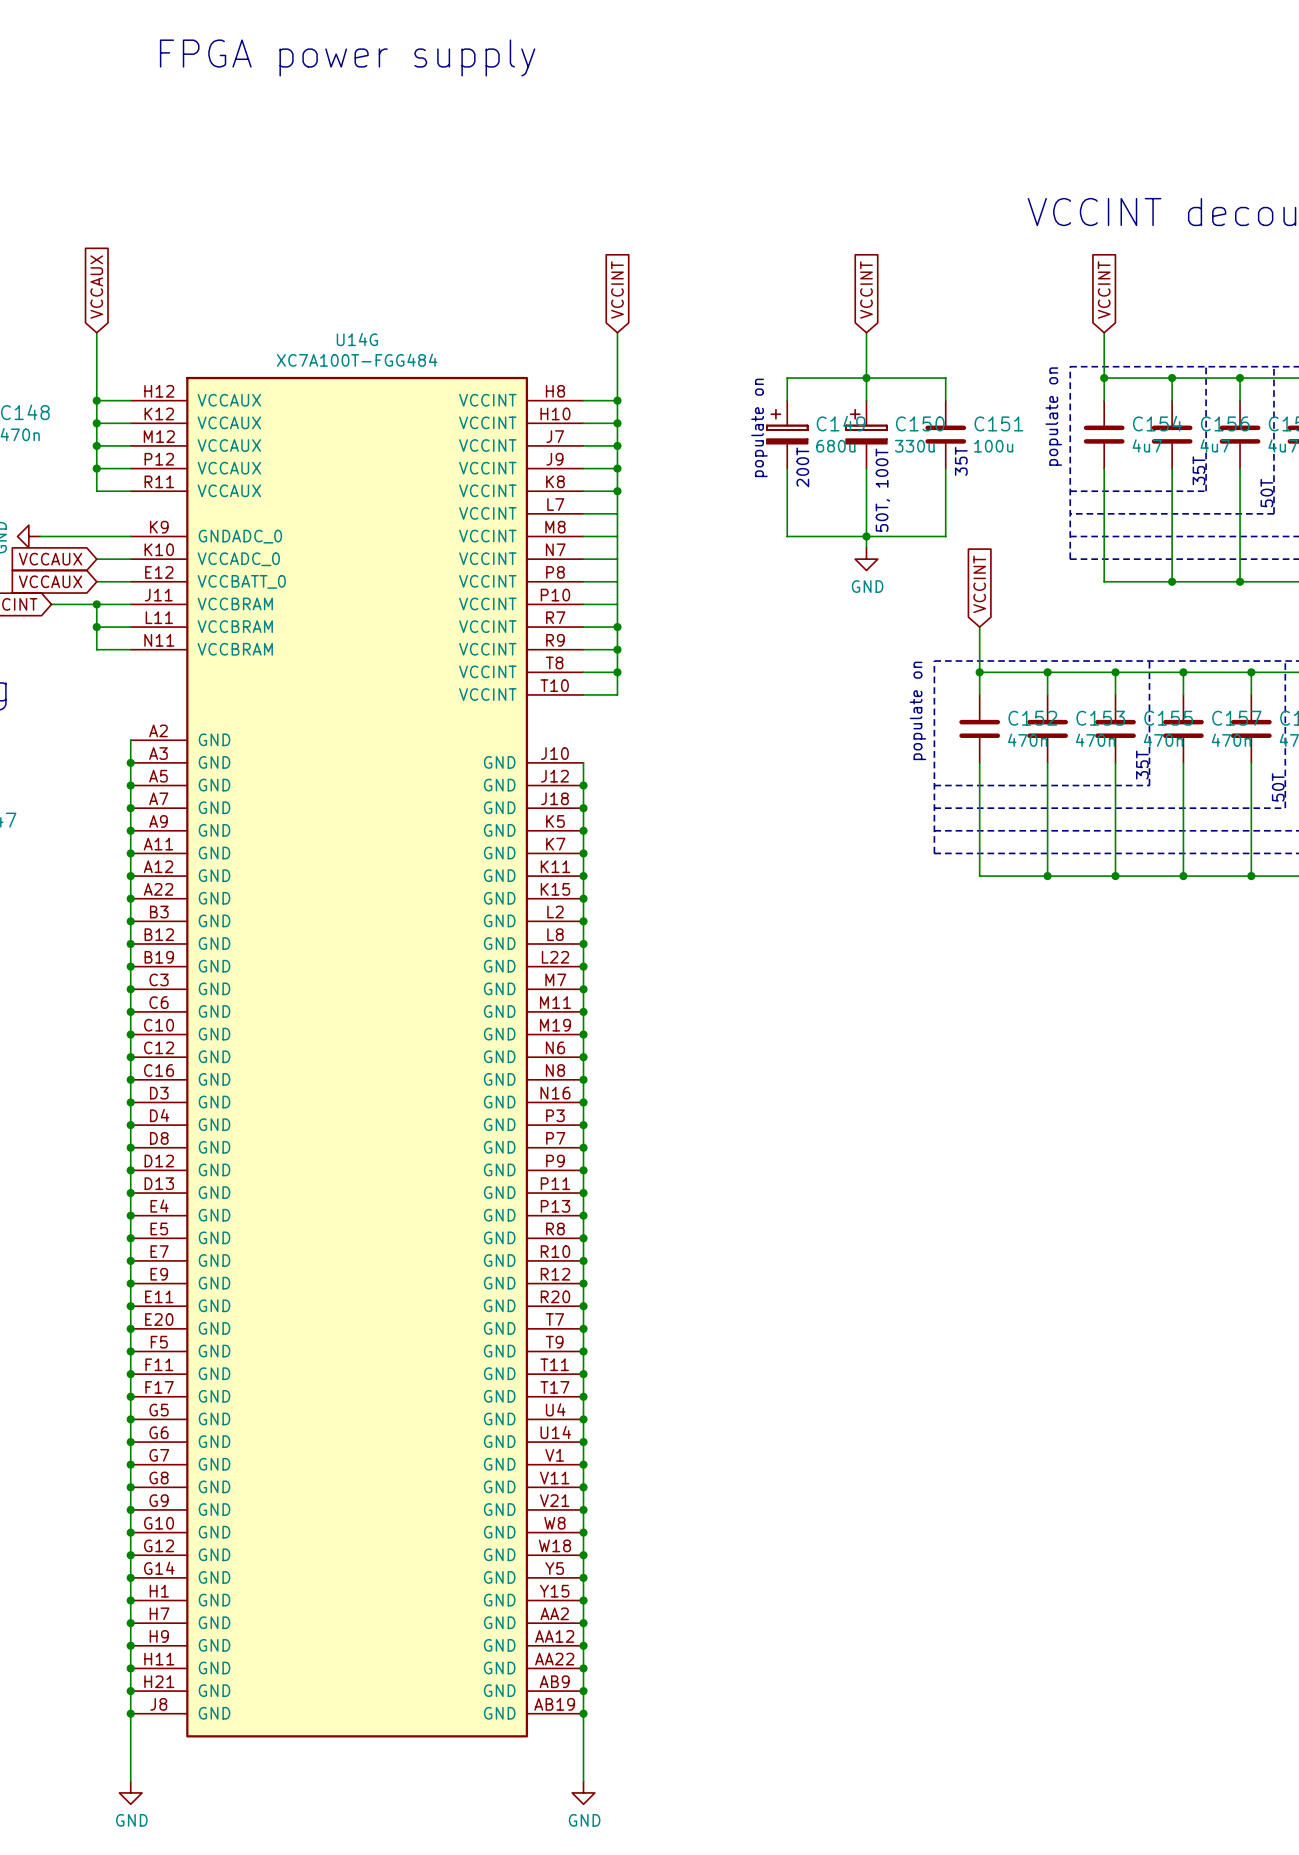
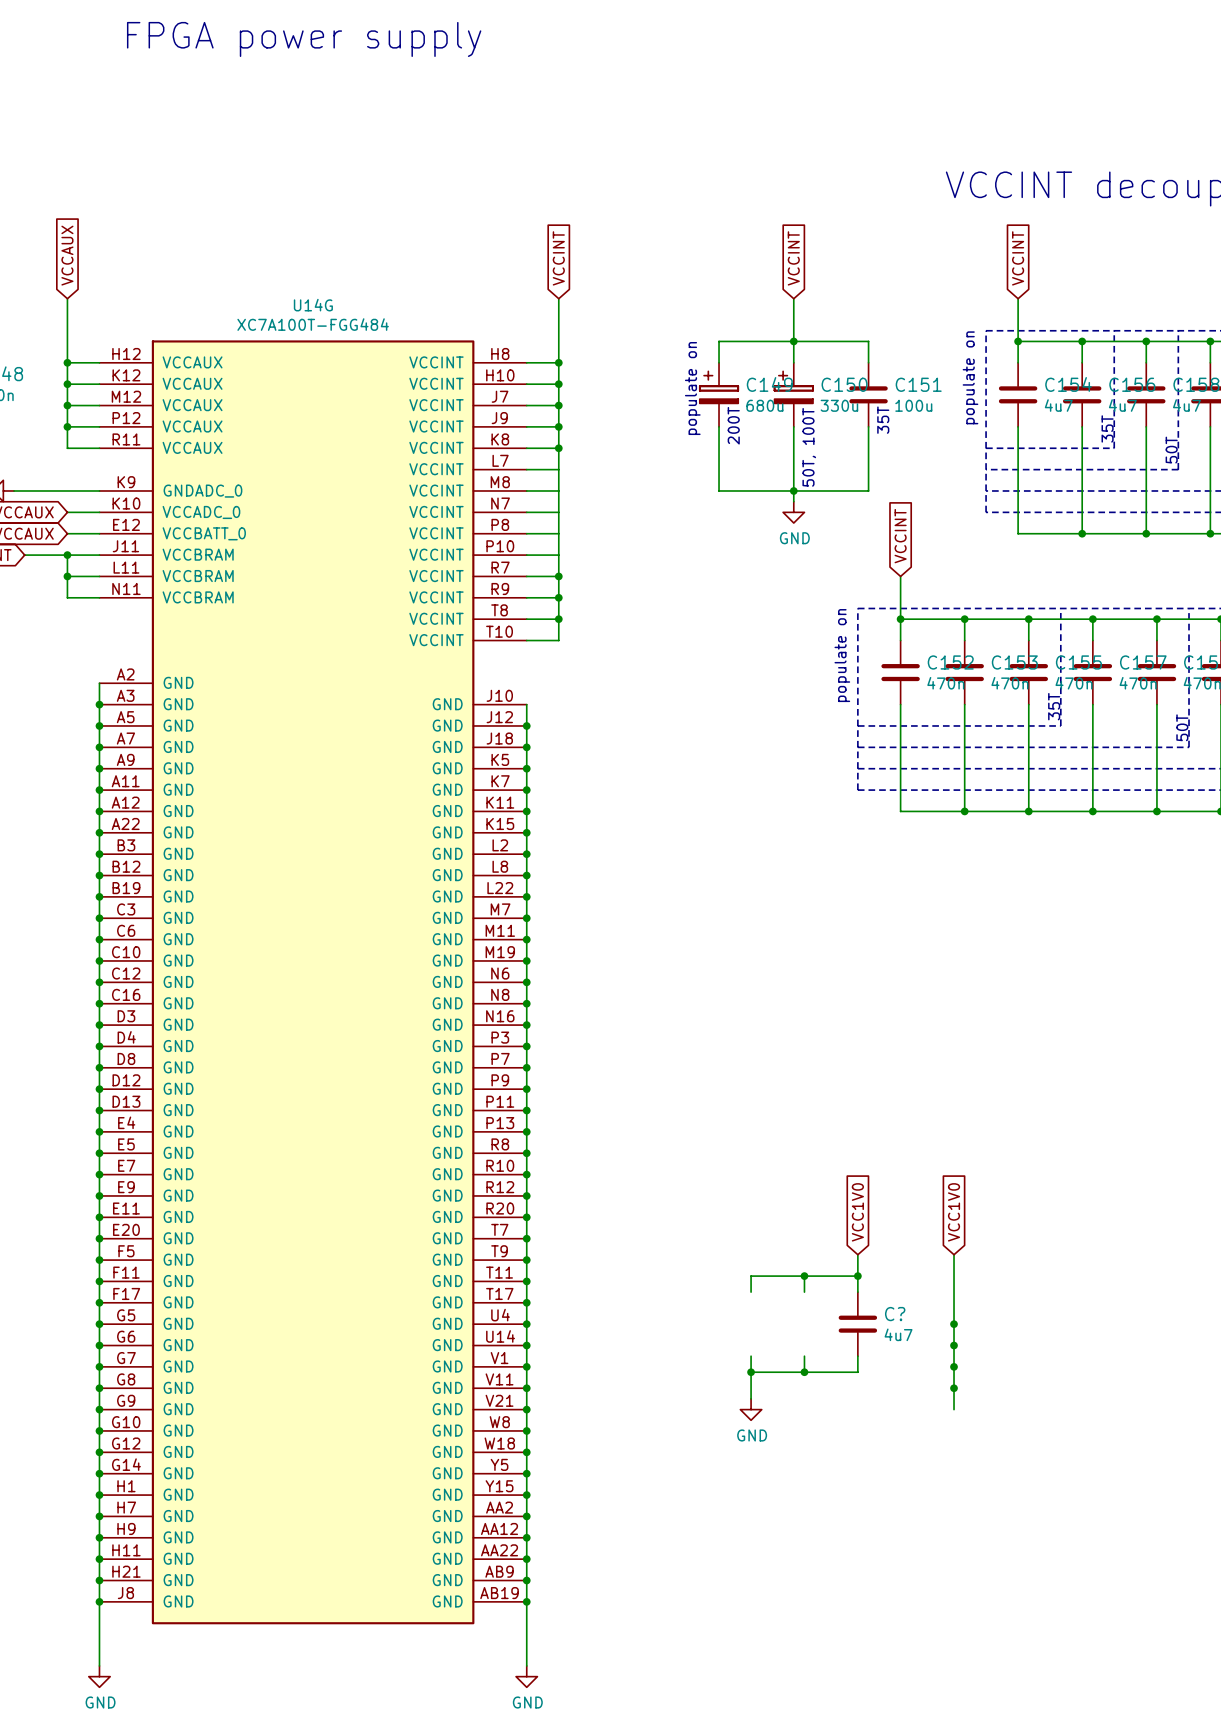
global label: none -> VCC1V0 (857, 1212)
global label: none -> VCC1V0 (954, 1212)
wire: none -> (857, 1254) (857, 1292)
wire: none -> (954, 1254) (954, 1409)
wire: none -> (804, 1276) (804, 1292)
junction: none -> (804, 1276)
wire: none -> (857, 1276) (751, 1276) (751, 1292)
junction: none -> (857, 1276)
C?: none -> (857, 1324)
junction: none -> (954, 1324)
junction: none -> (954, 1345)
wire: none -> (751, 1356) (751, 1398)
wire: none -> (804, 1356) (804, 1372)
wire: none -> (857, 1356) (857, 1372) (751, 1372)
junction: none -> (954, 1366)
junction: none -> (751, 1372)
junction: none -> (804, 1372)
junction: none -> (954, 1388)
power symbol: none -> GND (751, 1409)

